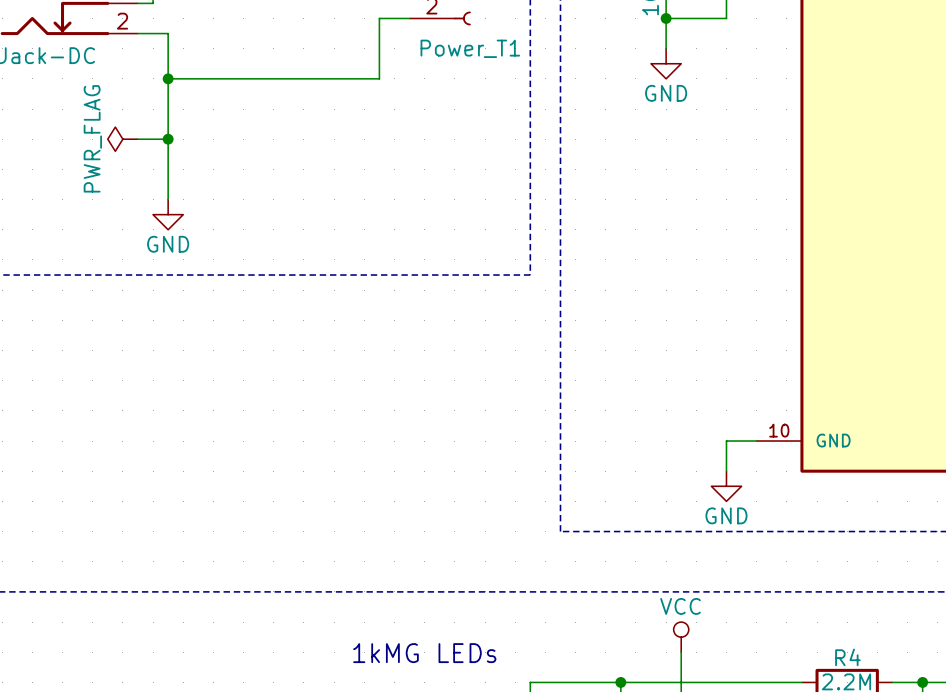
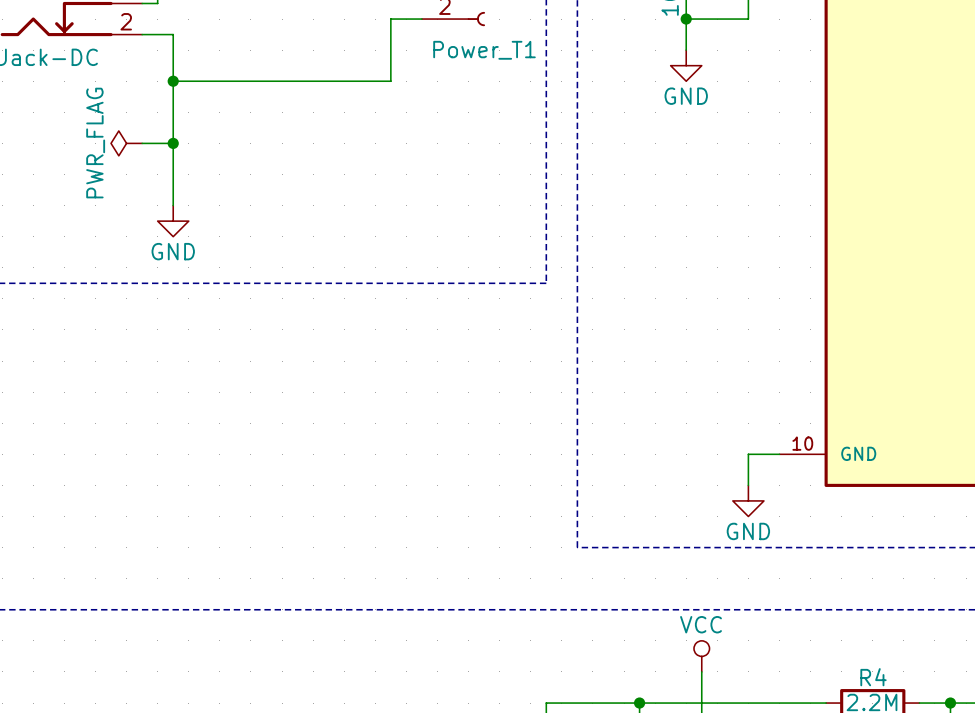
text: 1kMG LEDs (424, 653) -> none

